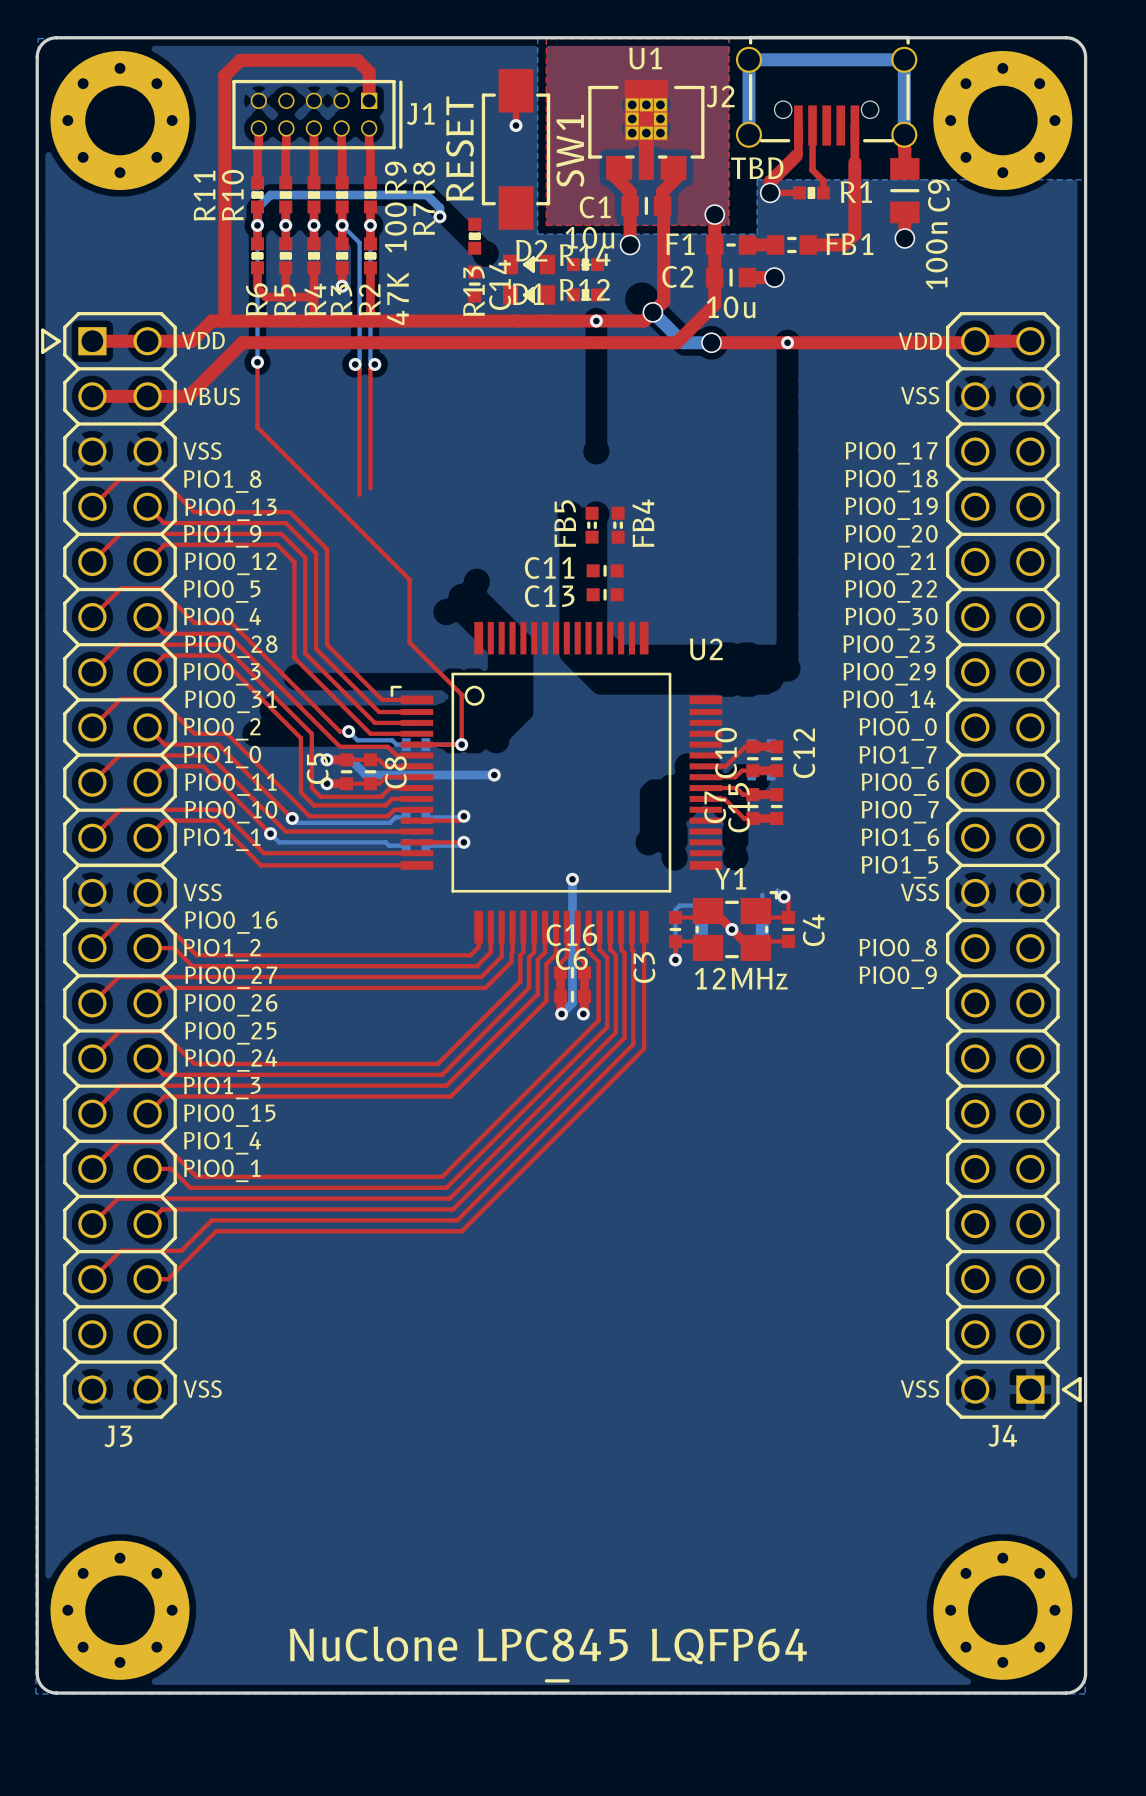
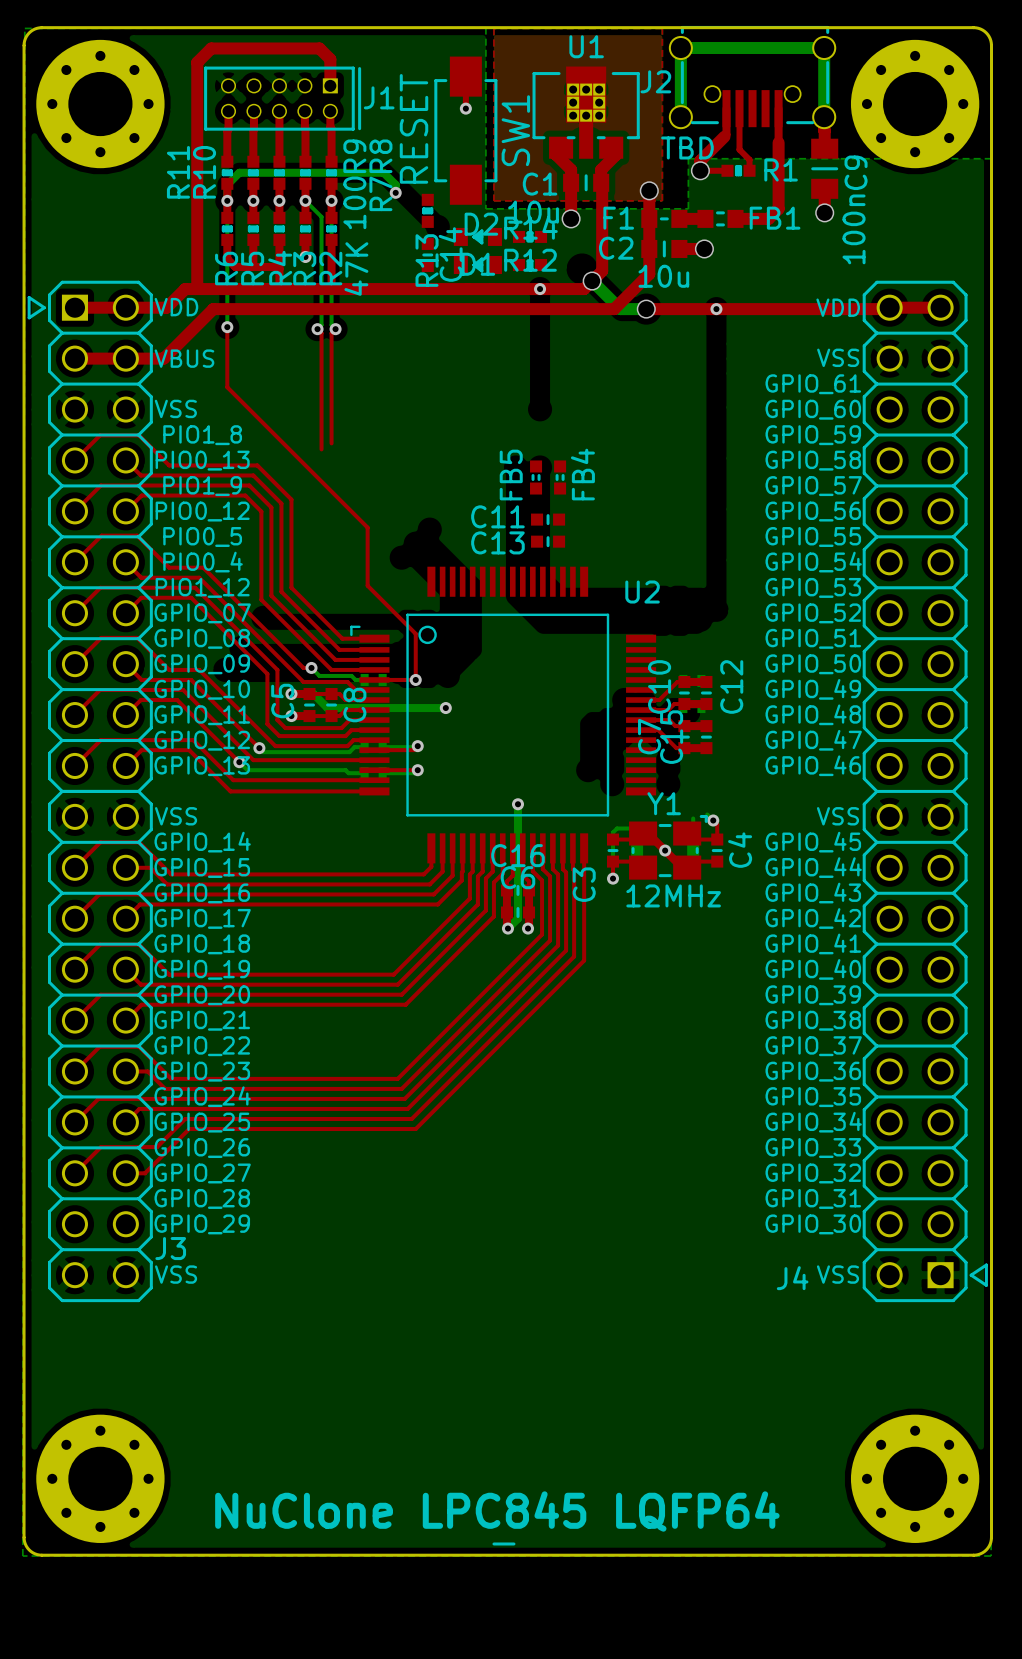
J3 footprint: [41, 312, 177, 1419] -> [27, 280, 153, 1303]
J4 footprint: [946, 312, 1082, 1419] -> [862, 280, 988, 1303]
J4 name position: J4 (1002, 1435) -> J4 (792, 1278)
J3 name position: J3 (118, 1436) -> J3 (170, 1248)

